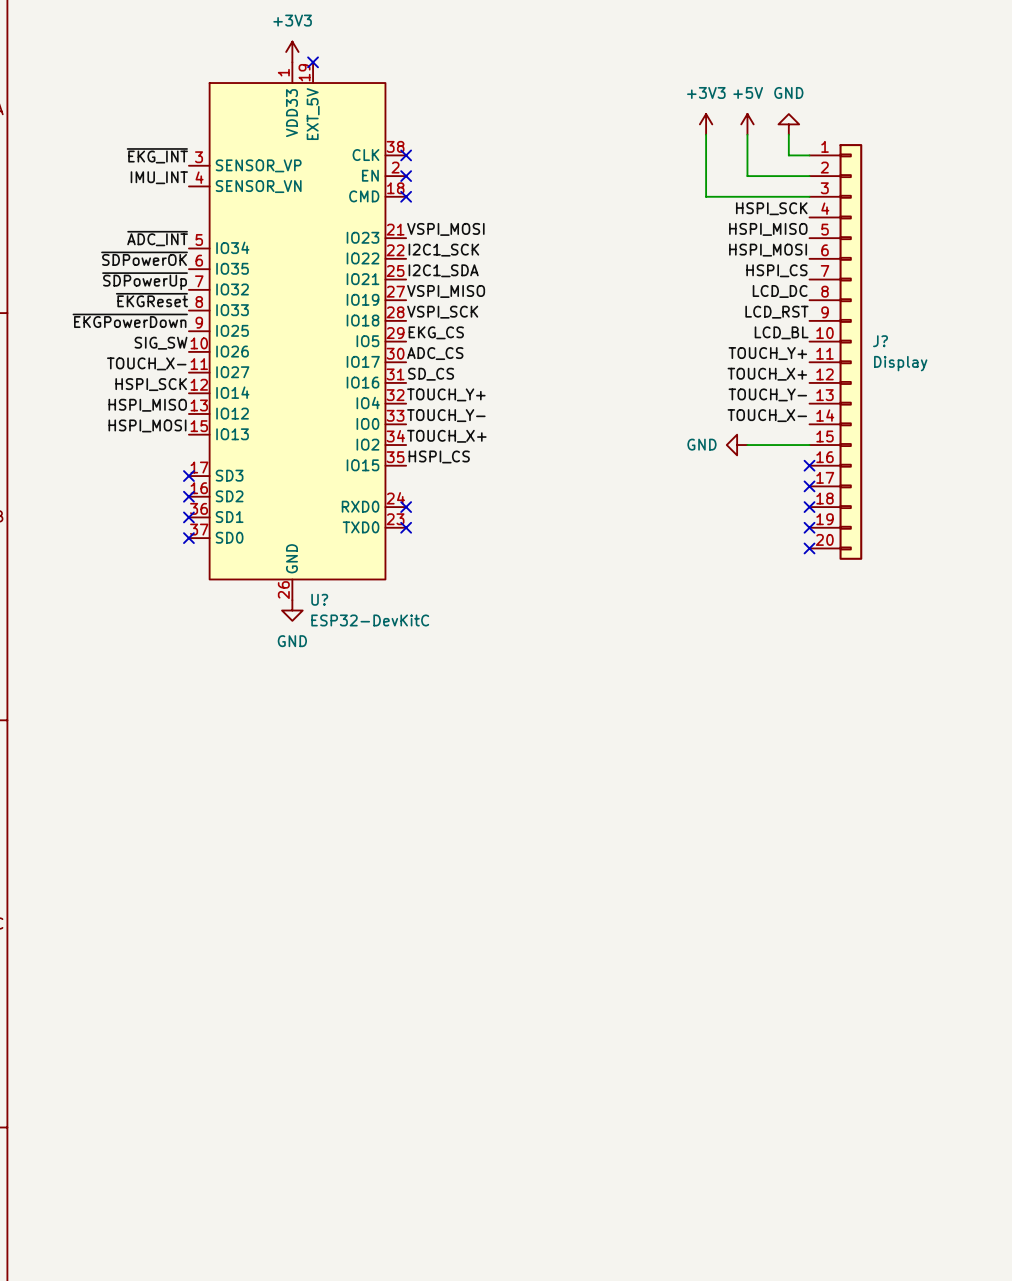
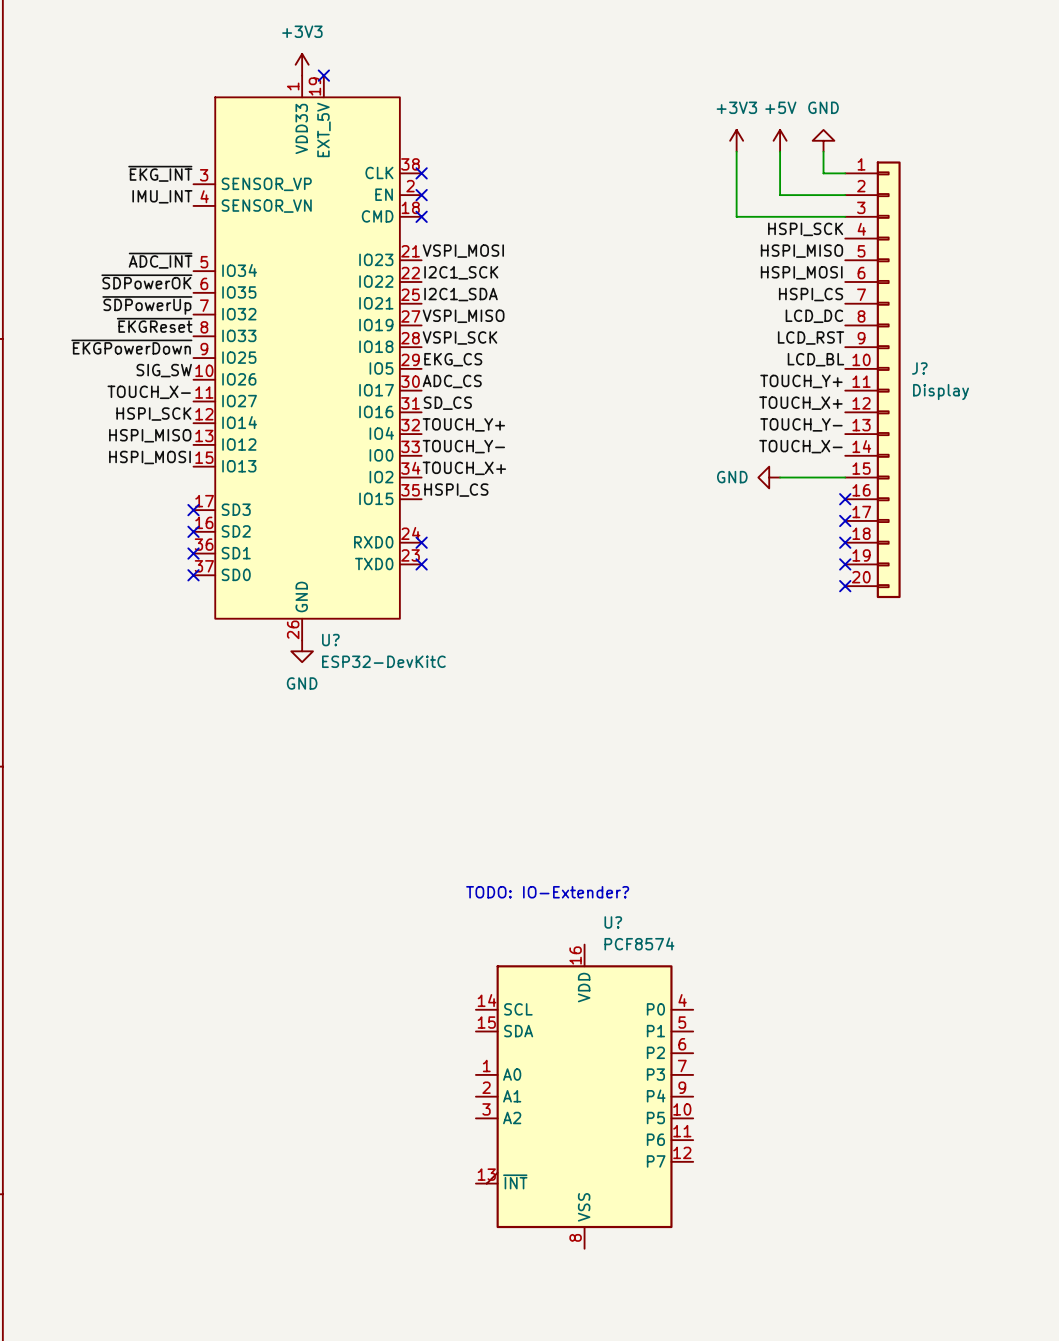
text: none -> TODO: IO-Extender? (547, 892)
U?: none -> PCF8574 (584, 1096)

